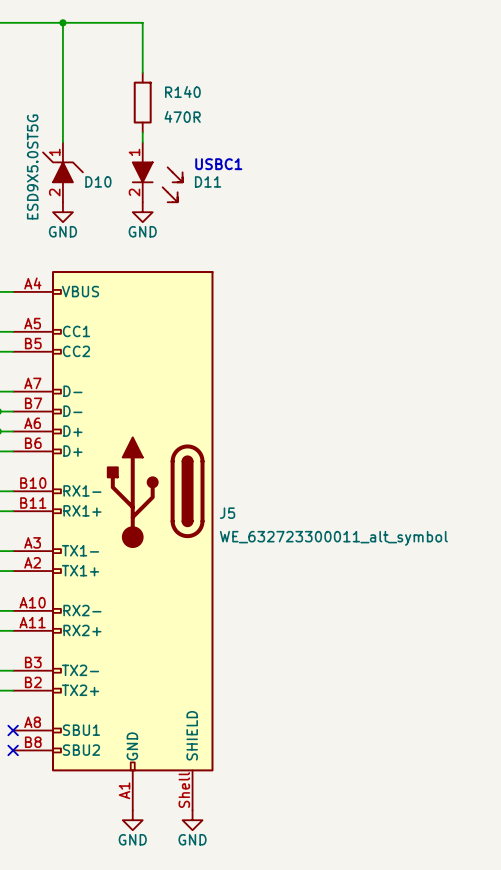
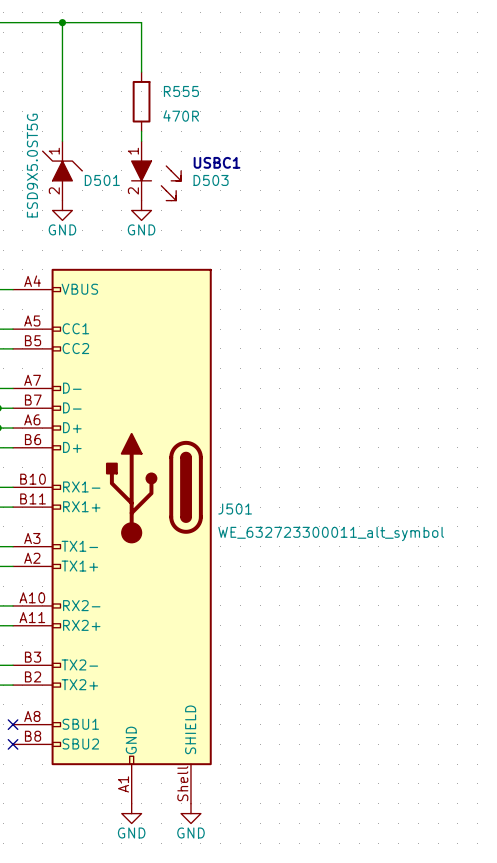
R140 name: R140 (182, 91) -> R555 (181, 91)
D10 name: D10 (98, 181) -> D501 (102, 180)
D11 name: D11 (208, 181) -> D503 (211, 180)
J5 name: J5 (227, 513) -> J501 (235, 509)

